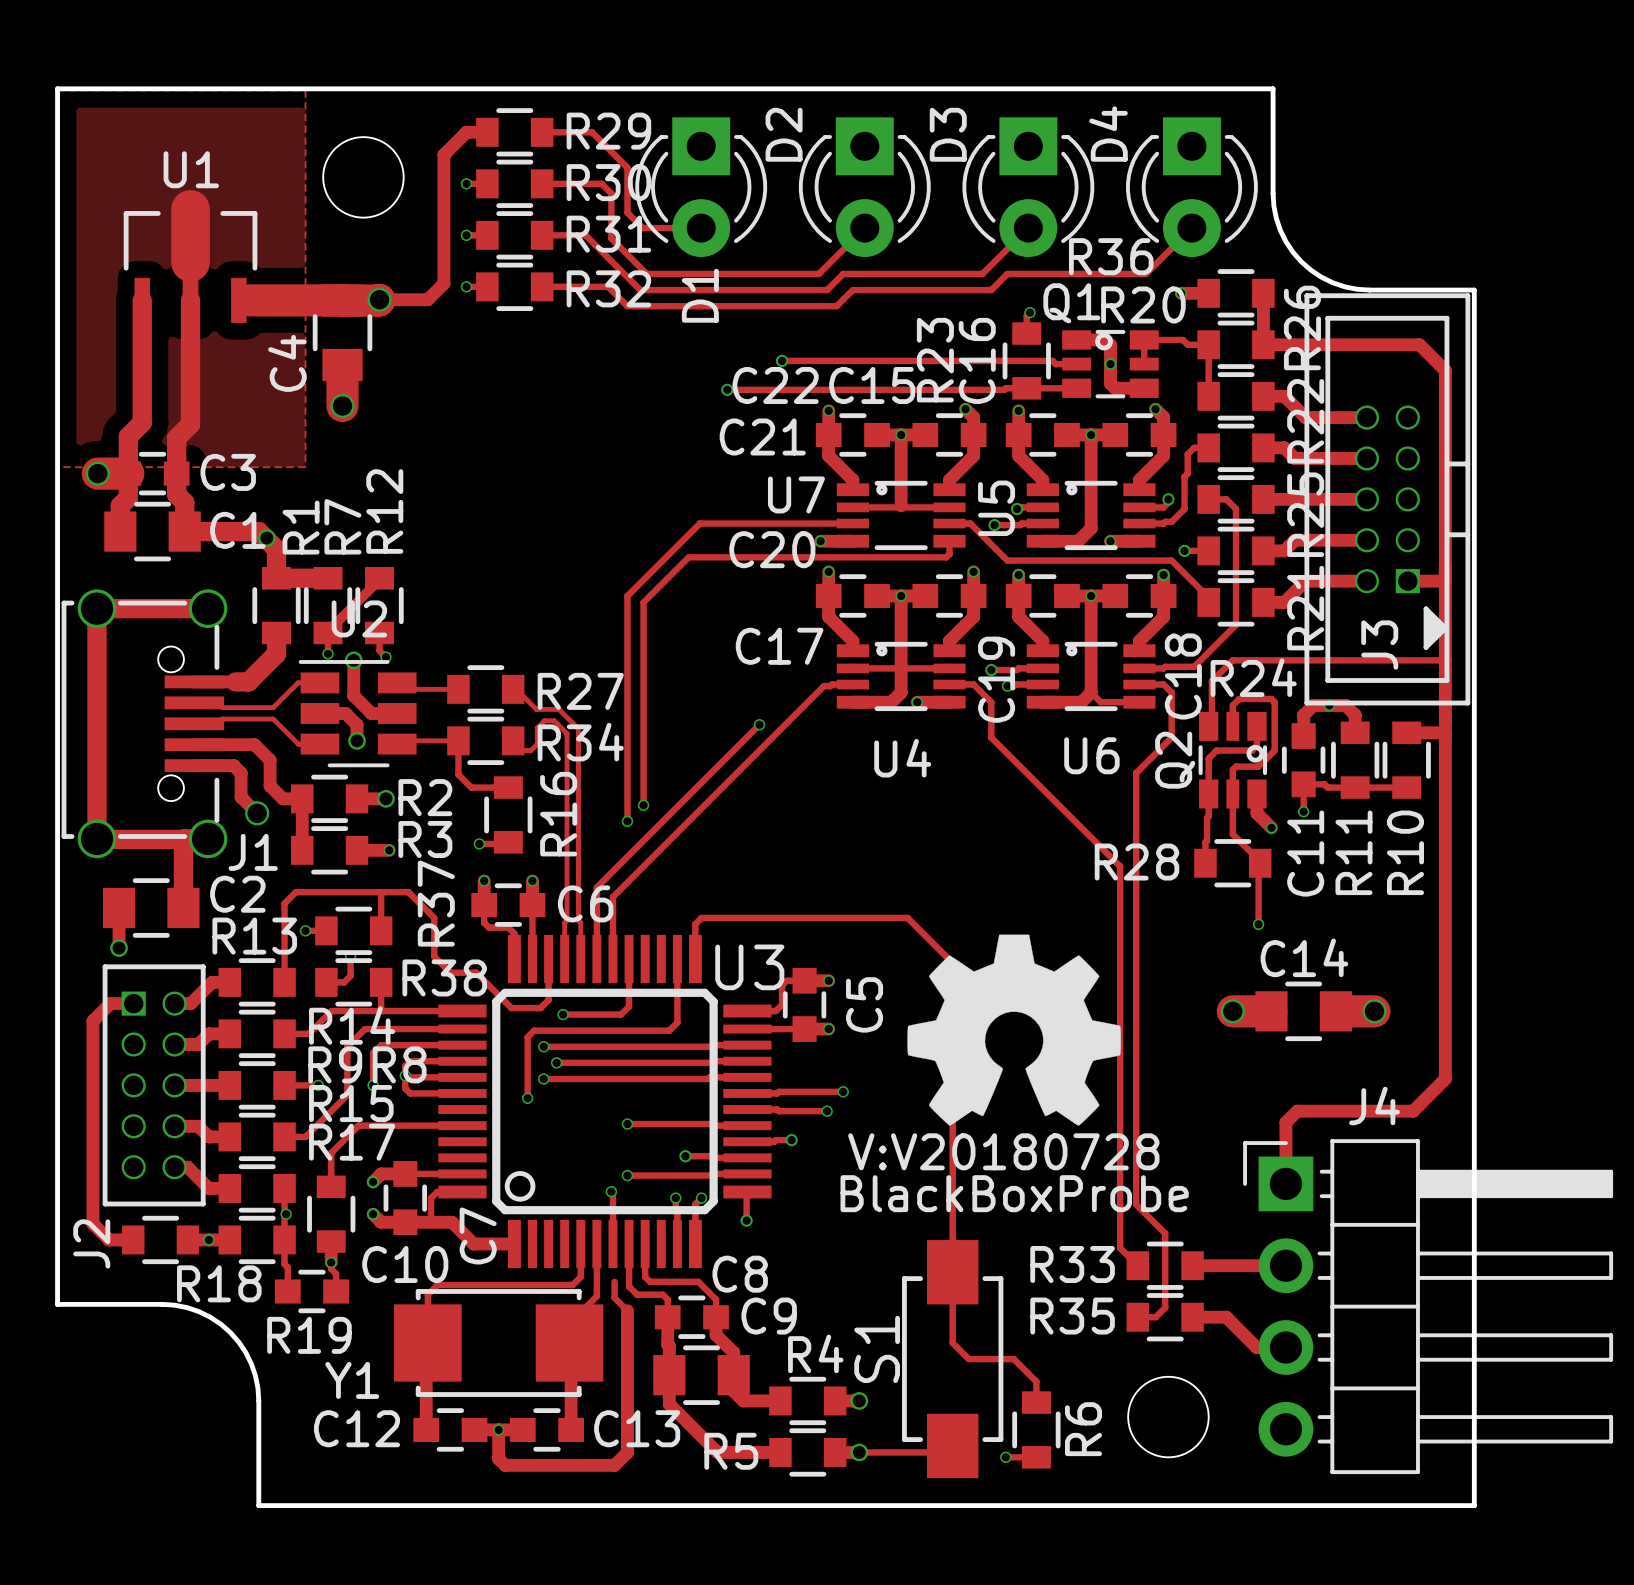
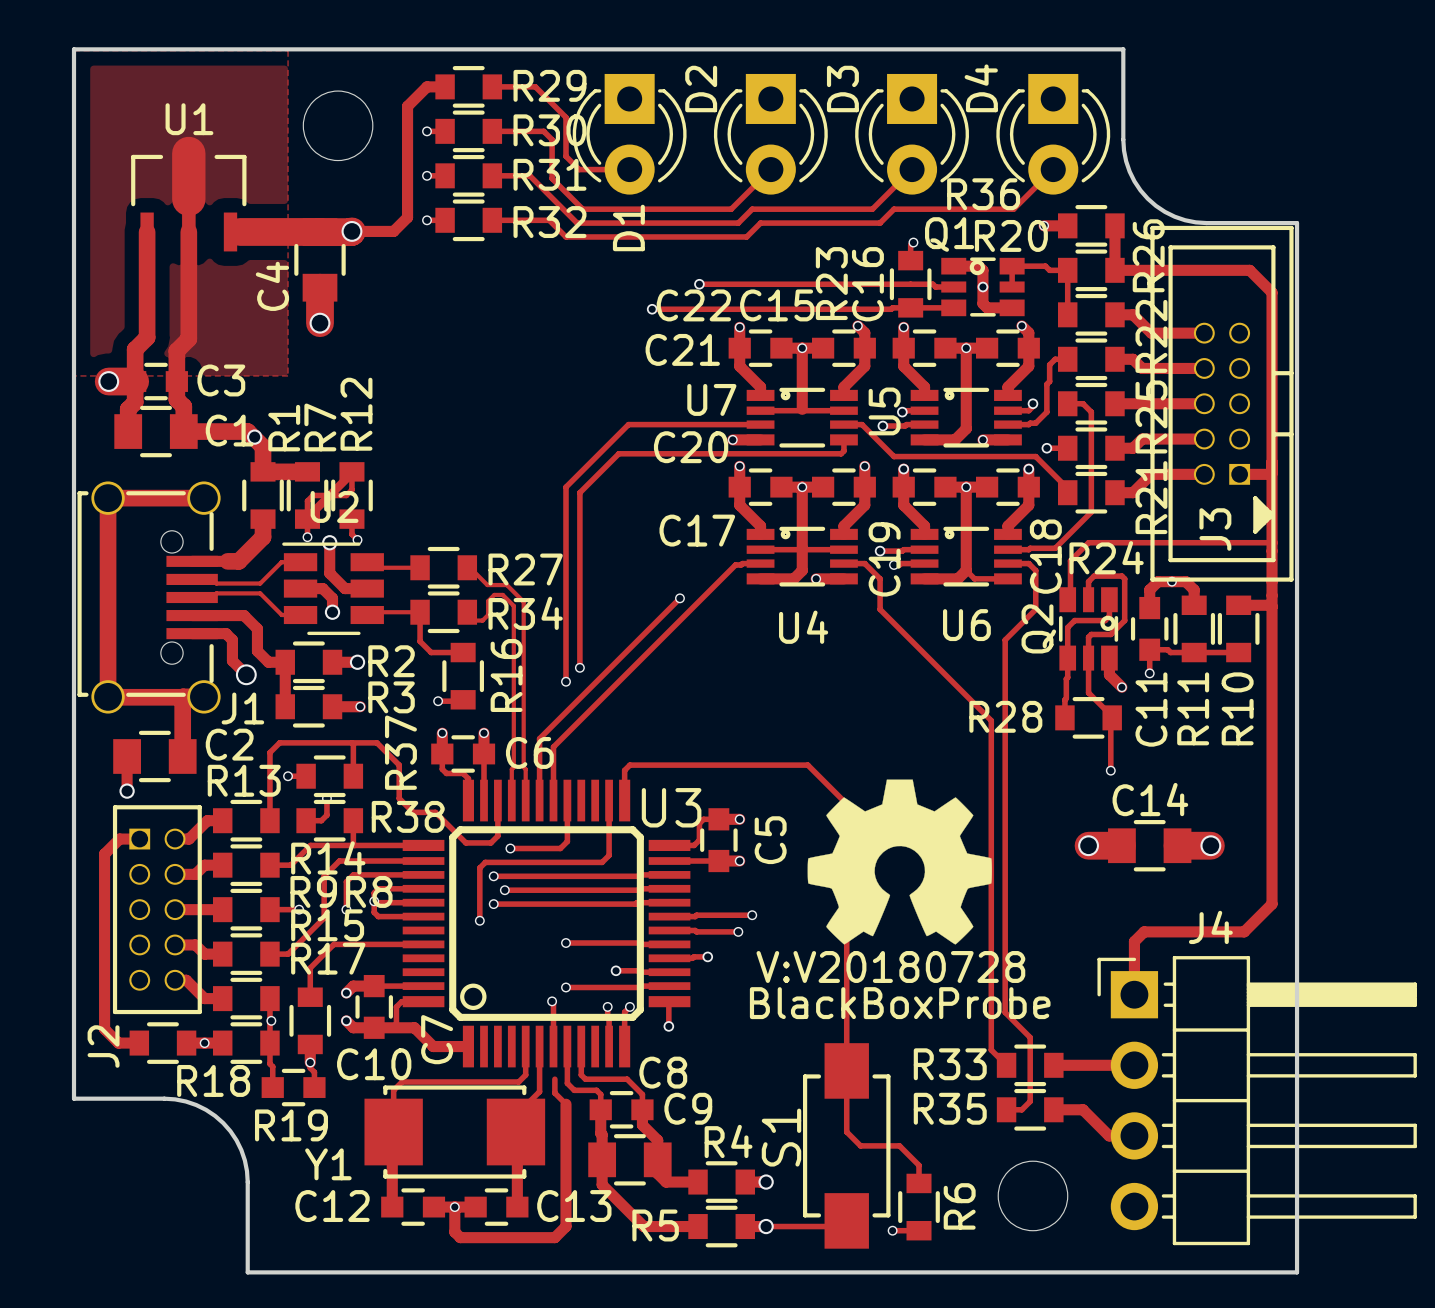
track: none -> (351, 471) (351, 489) (346, 495) (313, 495) (307, 501) (307, 519)

